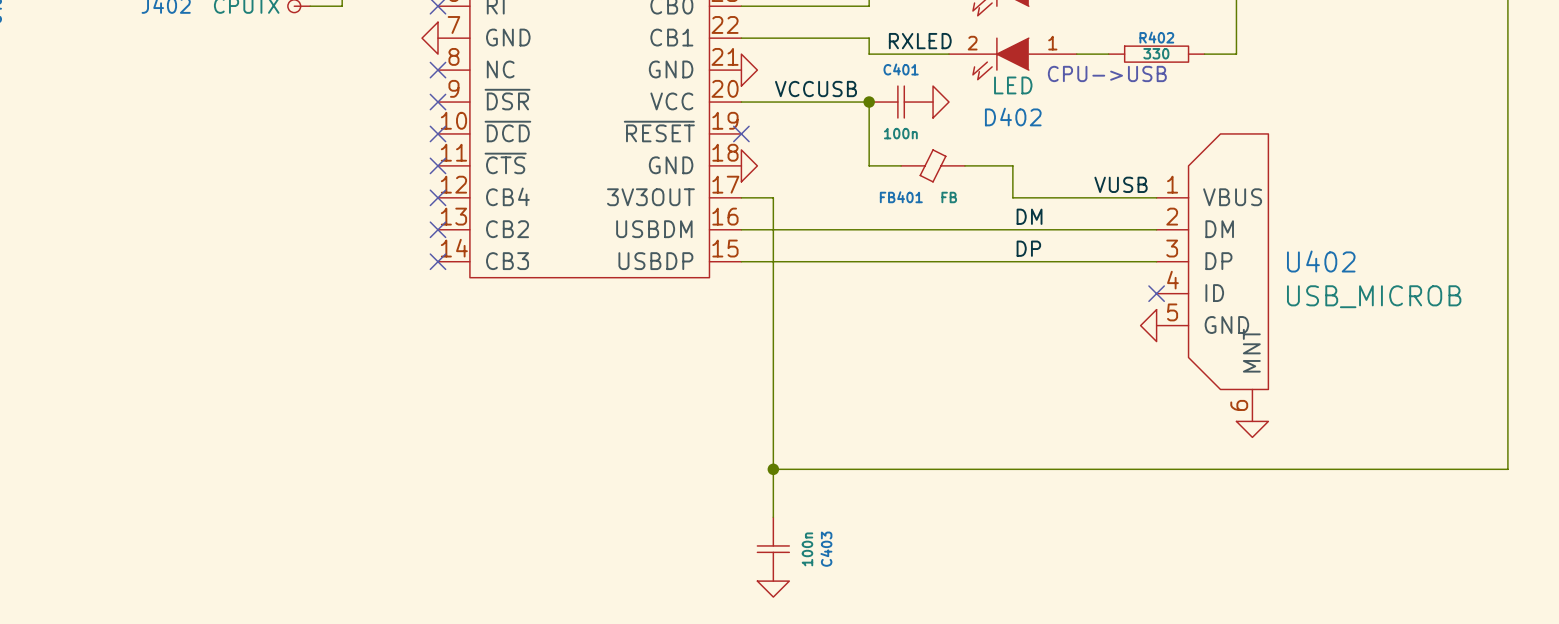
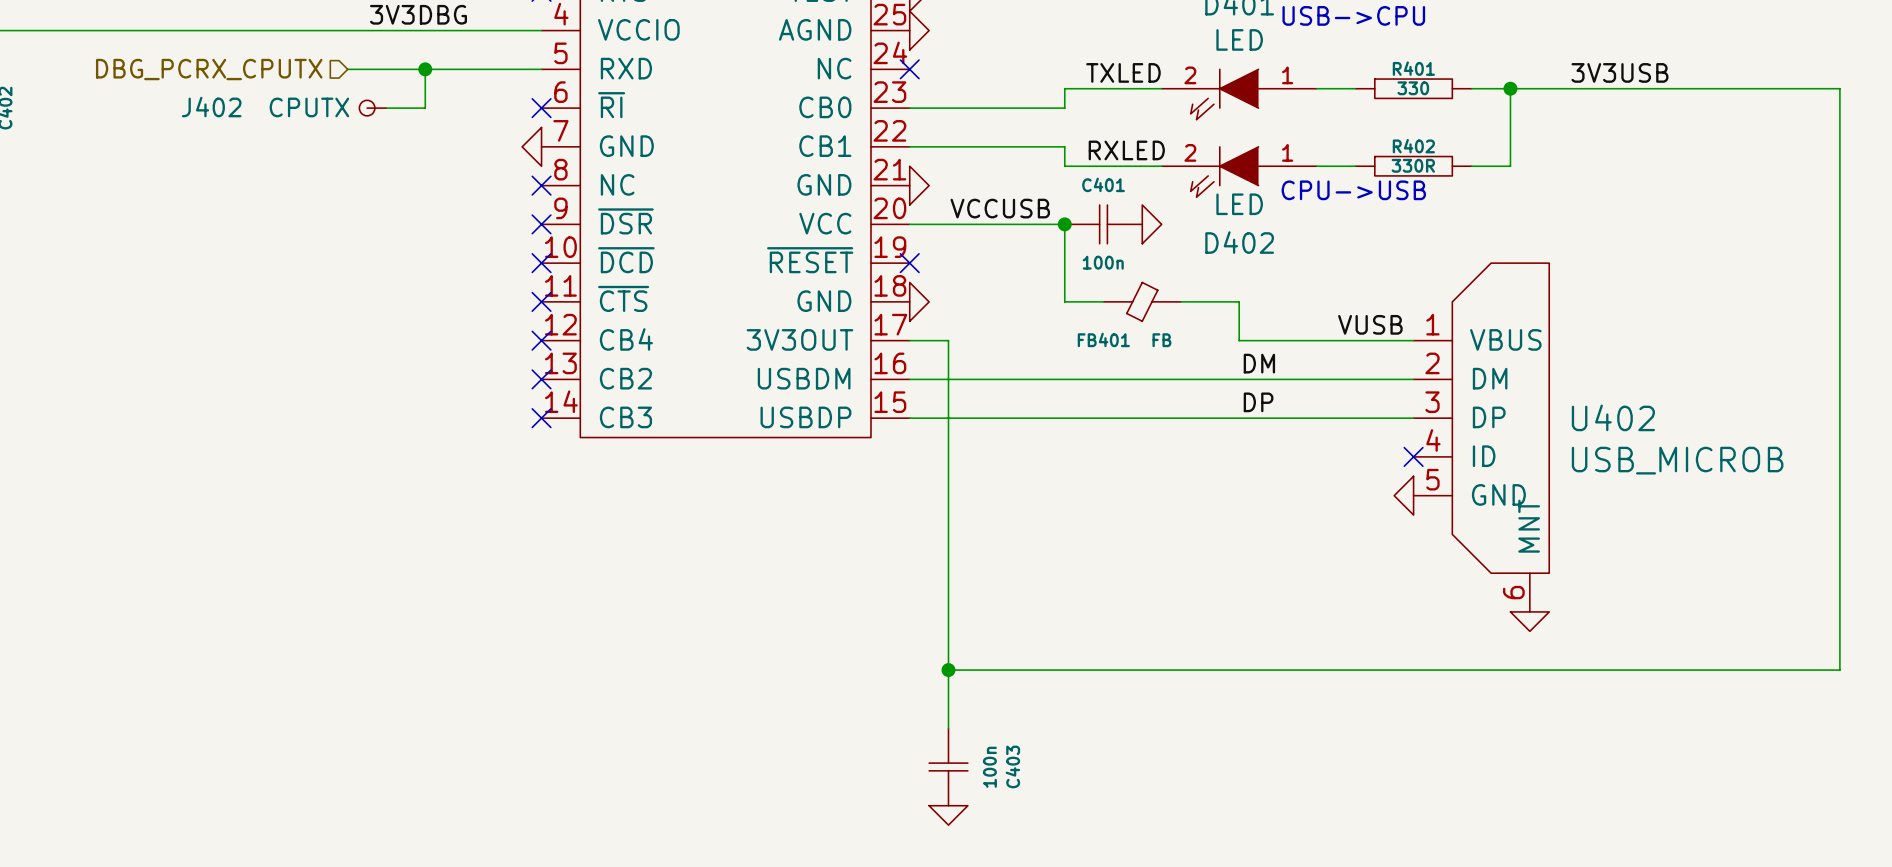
R402 value: 330 (1156, 53) -> 330R (1413, 165)

